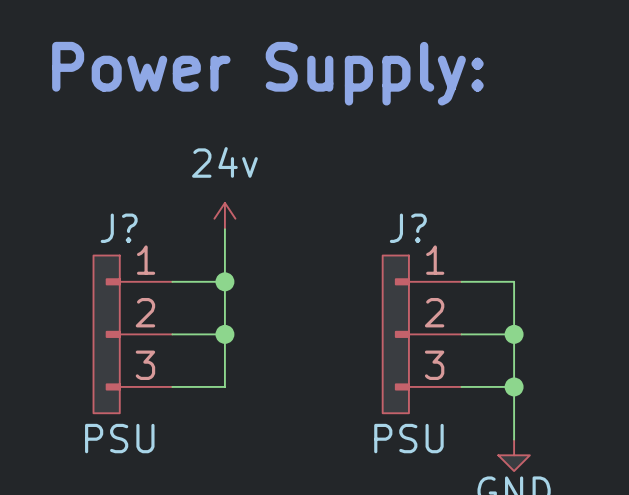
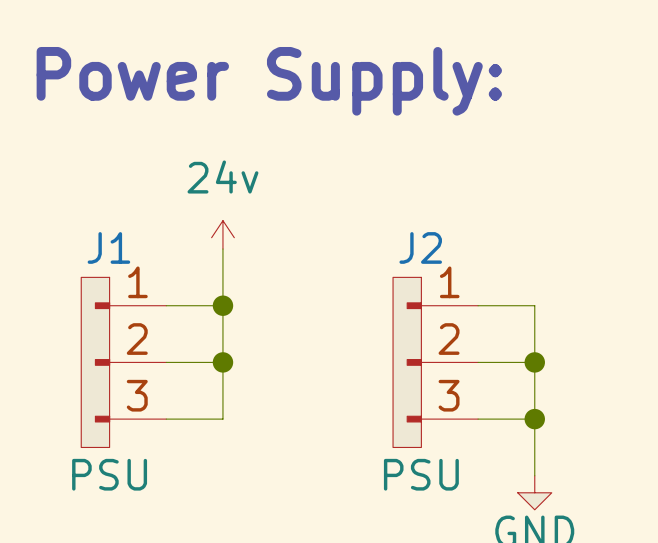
J? name: J? (119, 228) -> J1 (108, 247)
J? name: J? (408, 228) -> J2 (420, 247)

